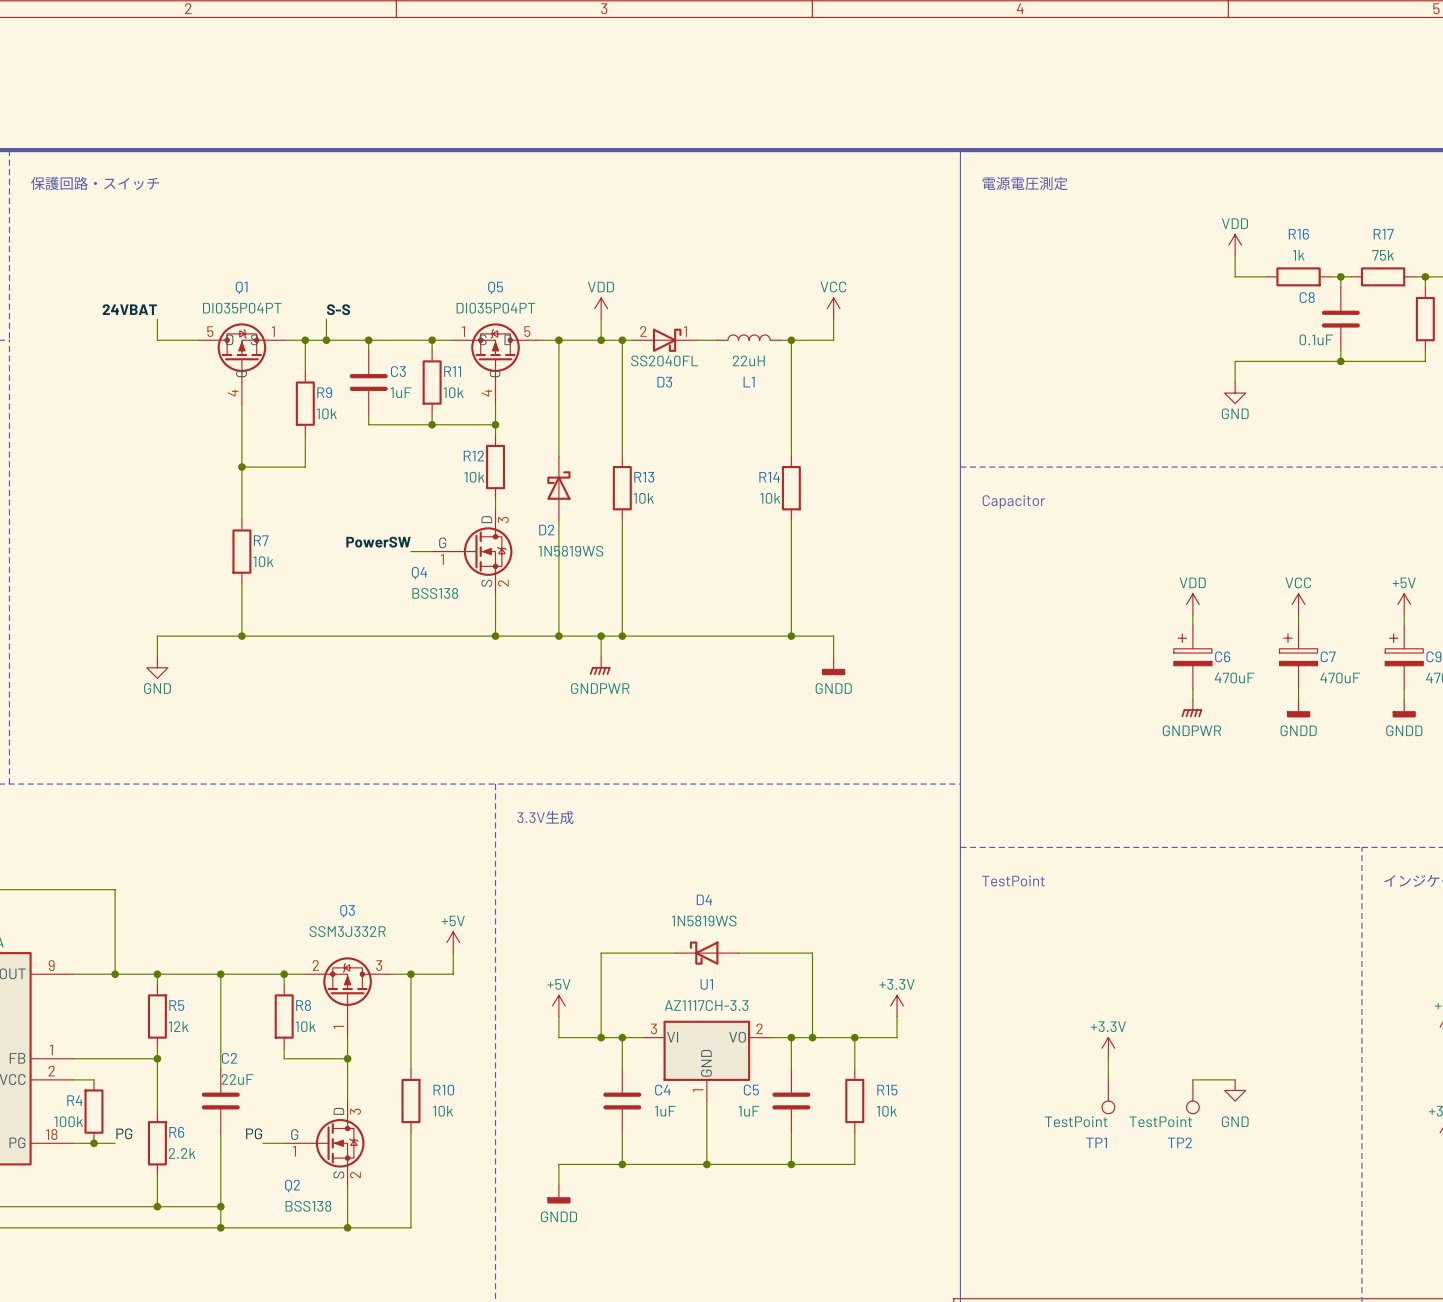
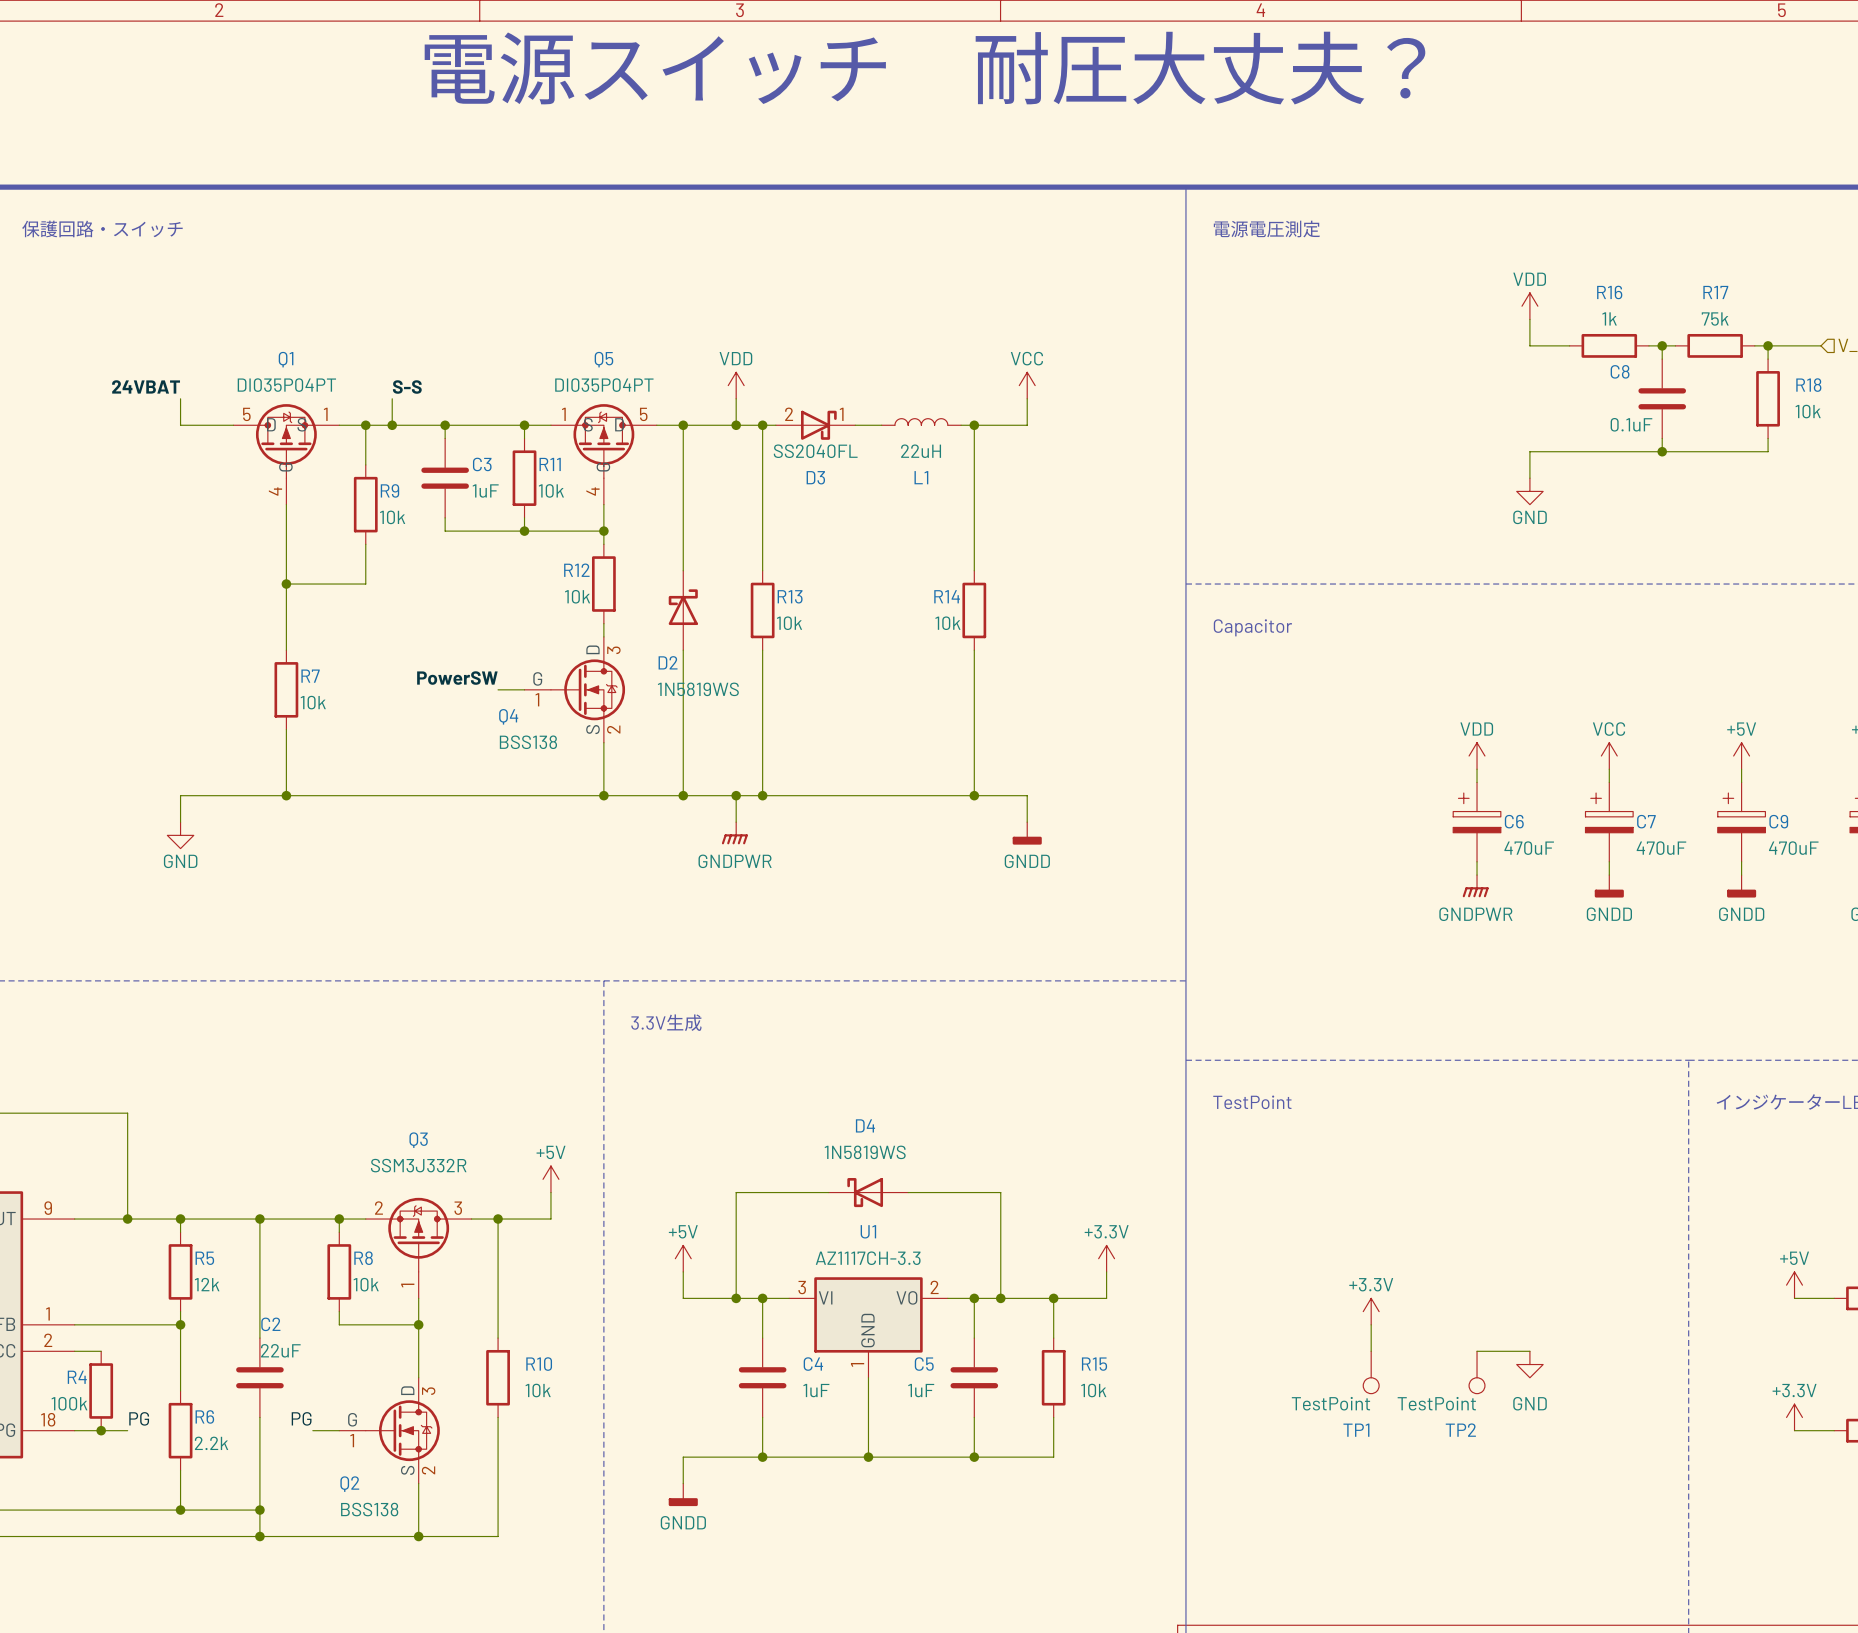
text: none -> 電源スイッチ 耐圧大丈夫？ (924, 68)

